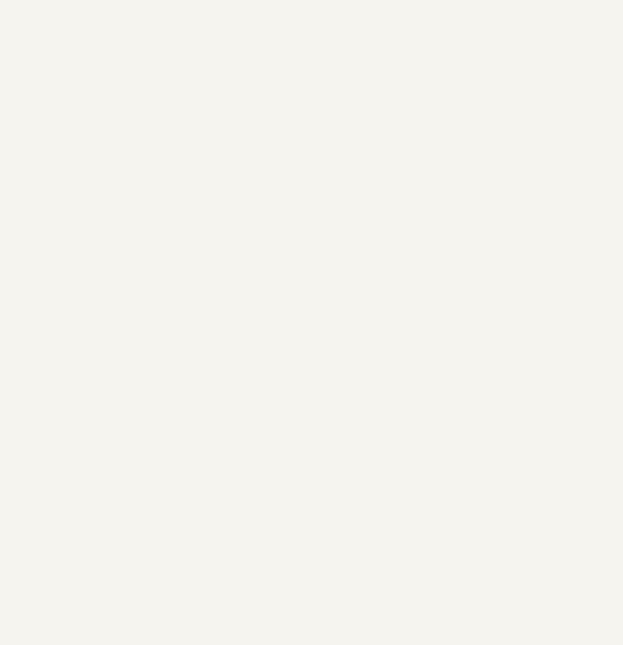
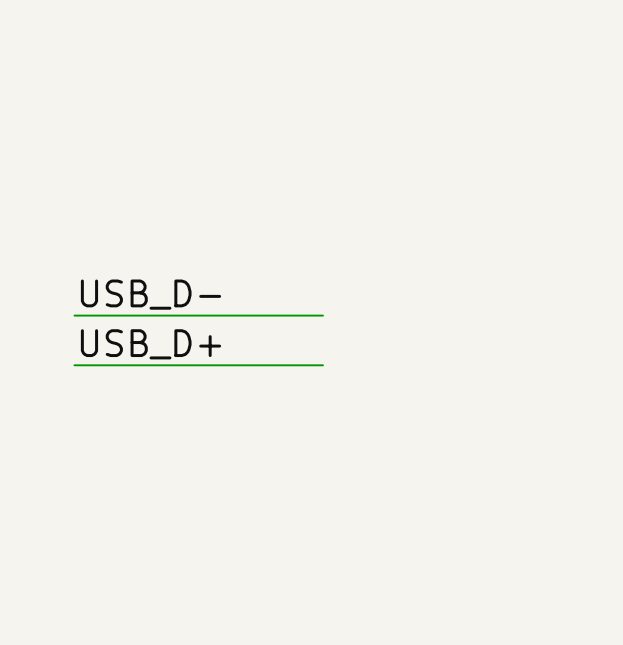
label: none -> USB_D- (151, 294)
wire: none -> (74, 315) (322, 315)
label: none -> USB_D+ (151, 344)
wire: none -> (74, 365) (322, 365)

